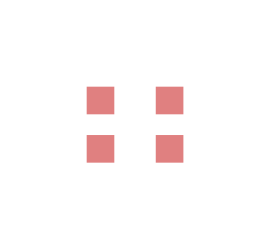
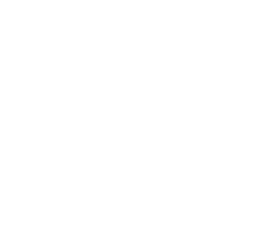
part: (100, 124) -> none
part: (169, 124) -> none

